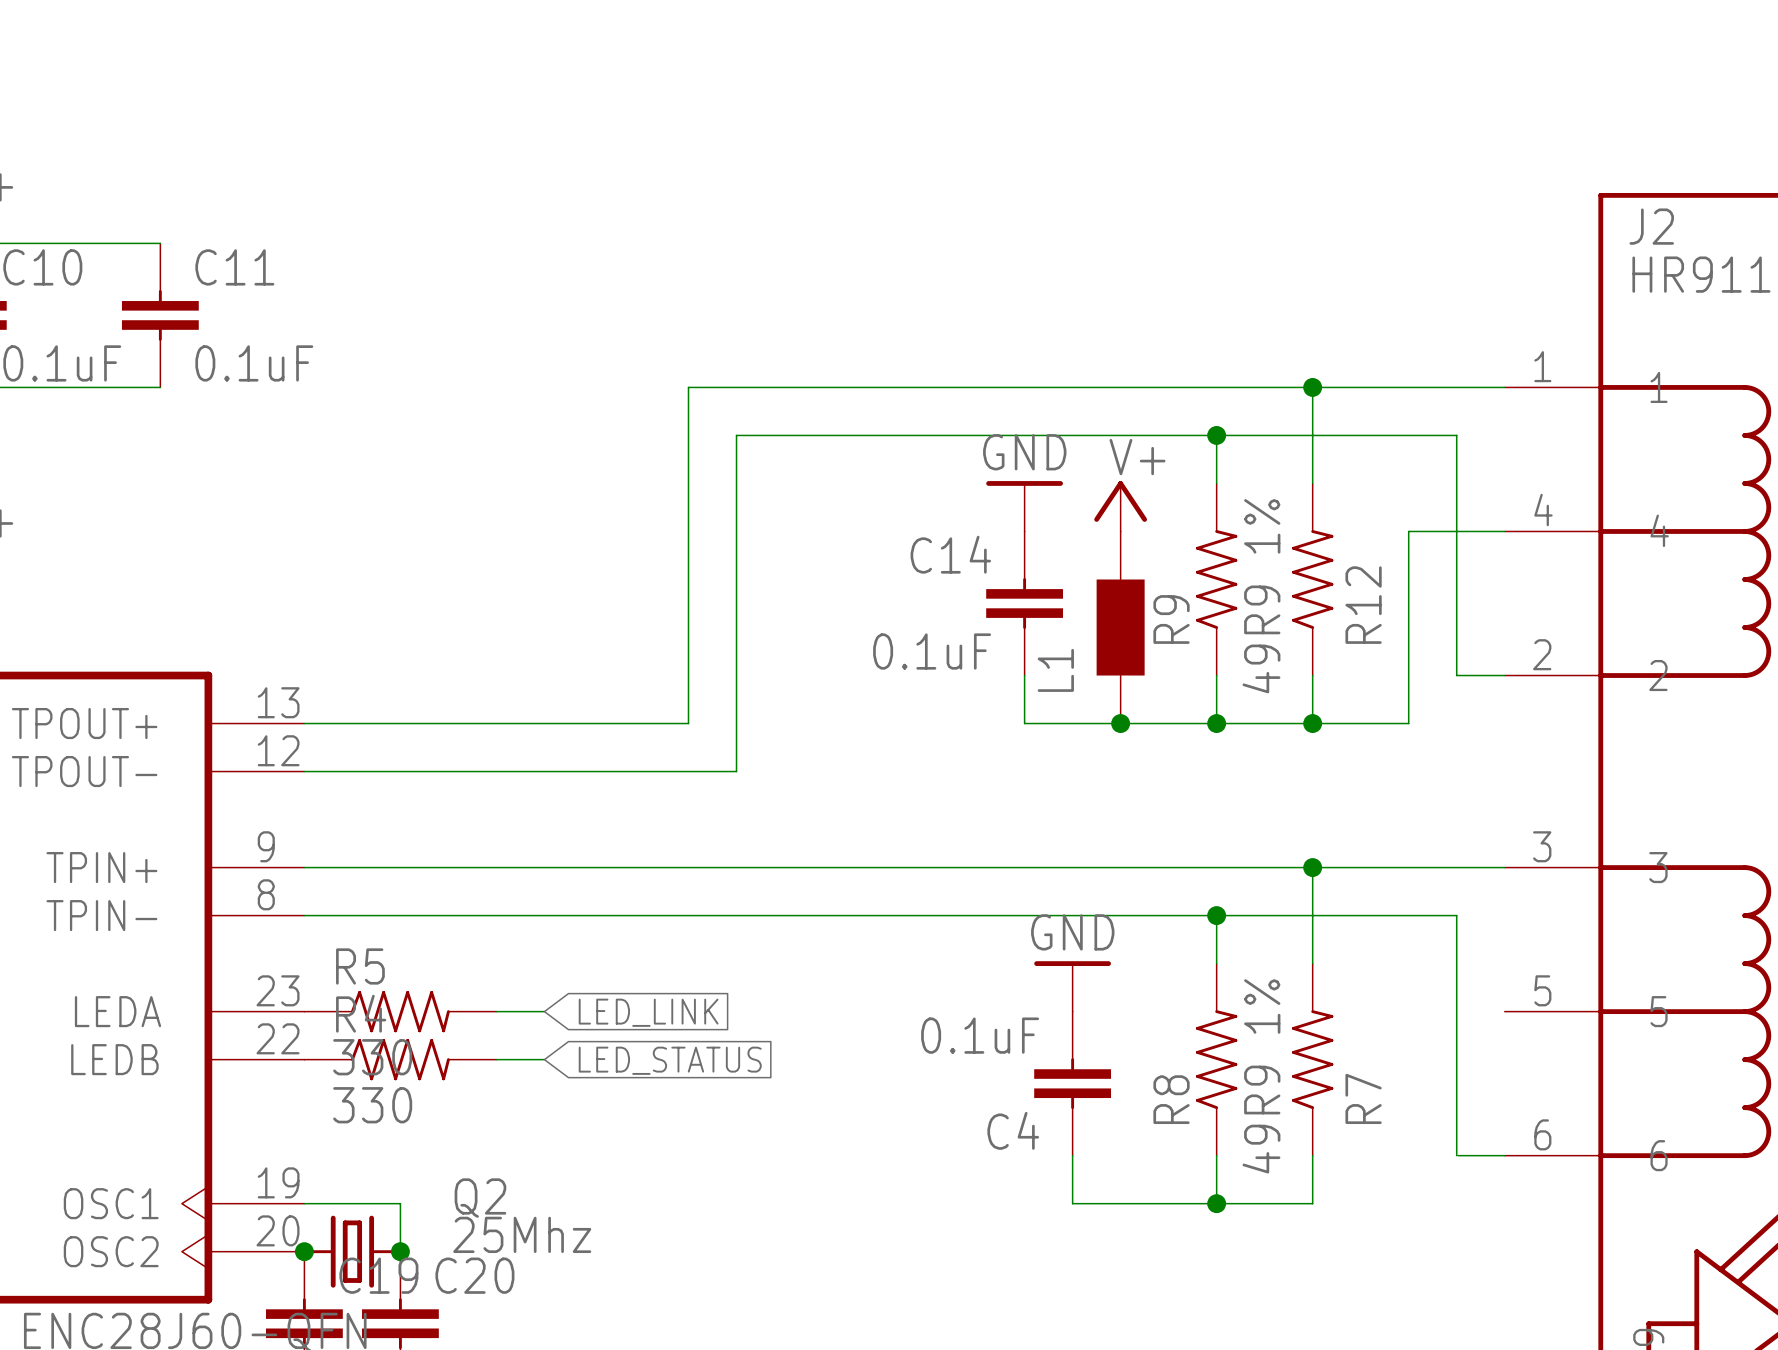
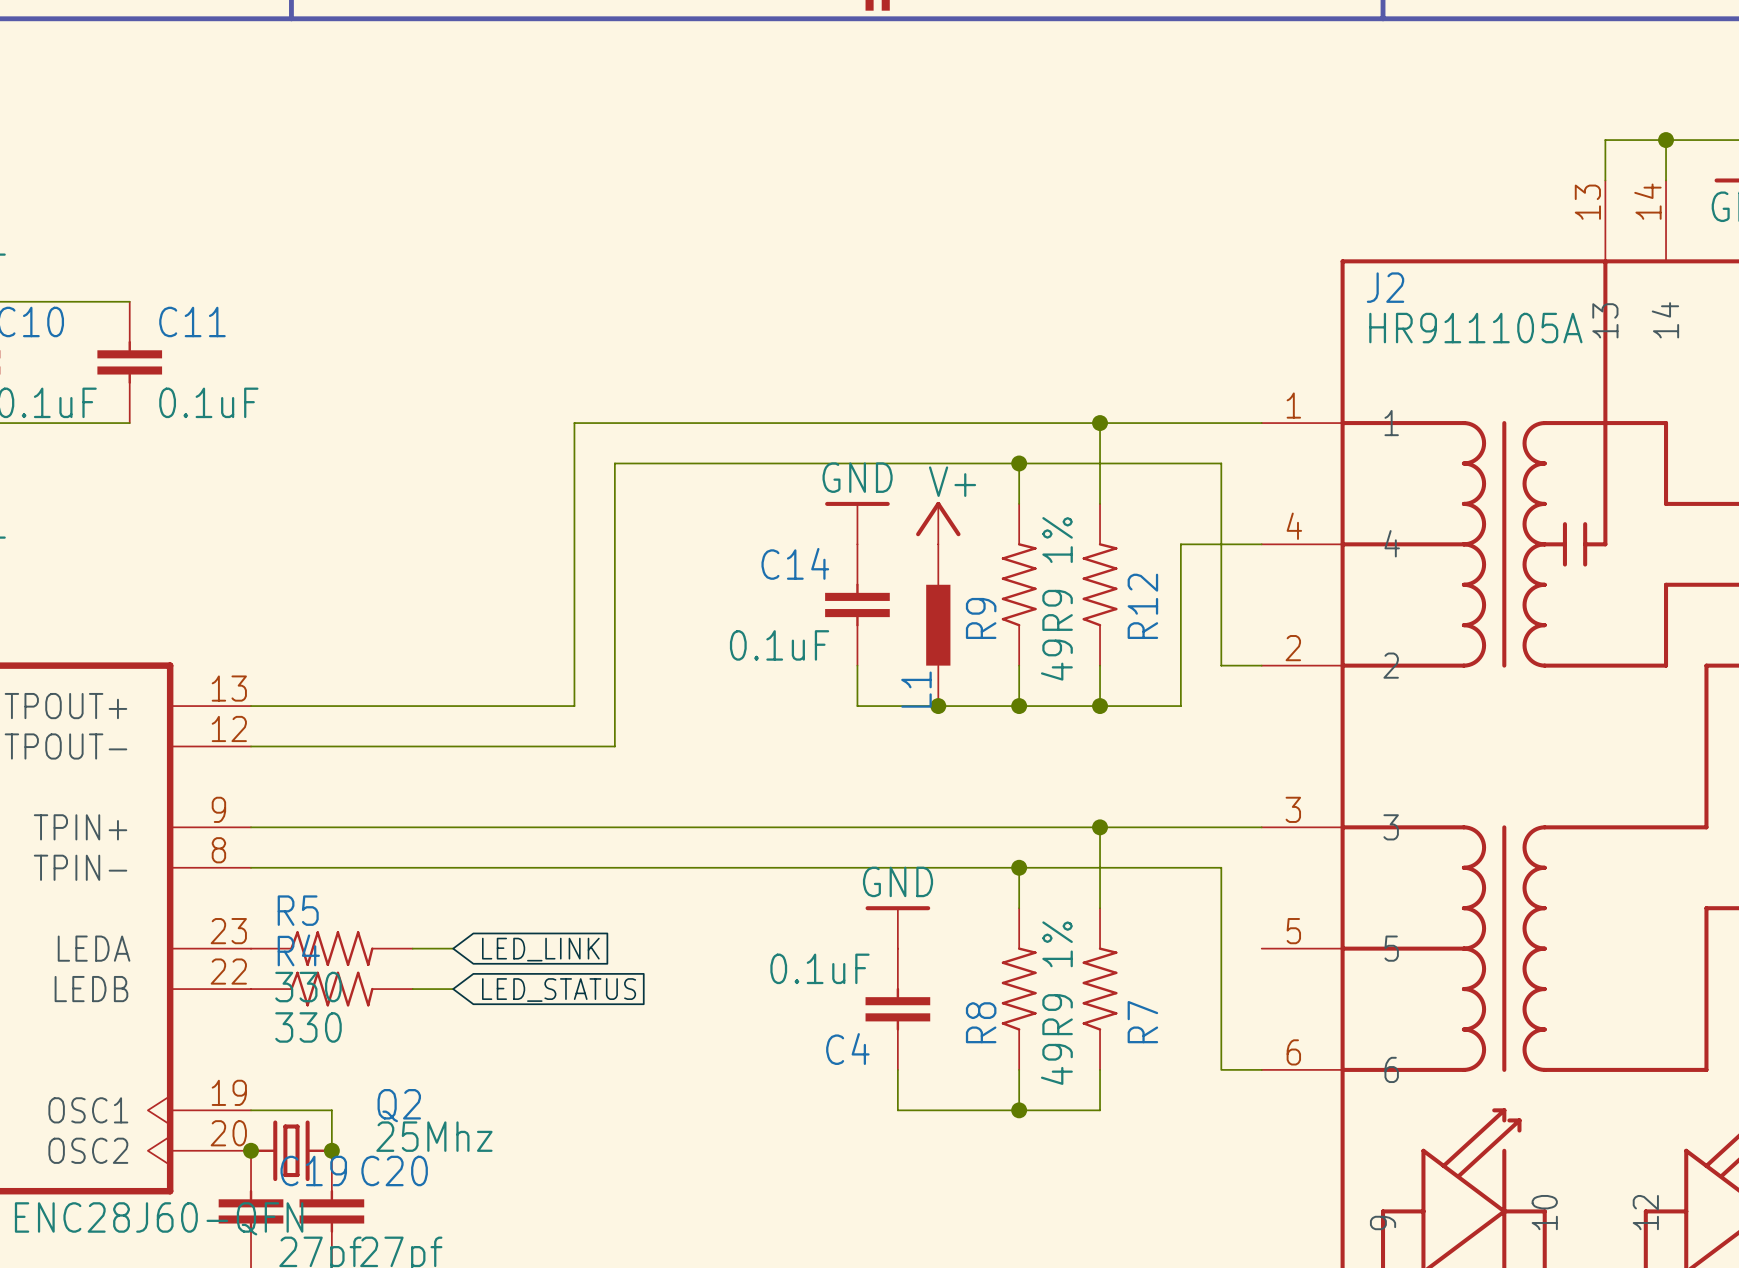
L1 symbol: [1096, 531, 1145, 724] -> [926, 544, 951, 707]
L1 name position: L1 (1055, 670) -> L1 (916, 689)

